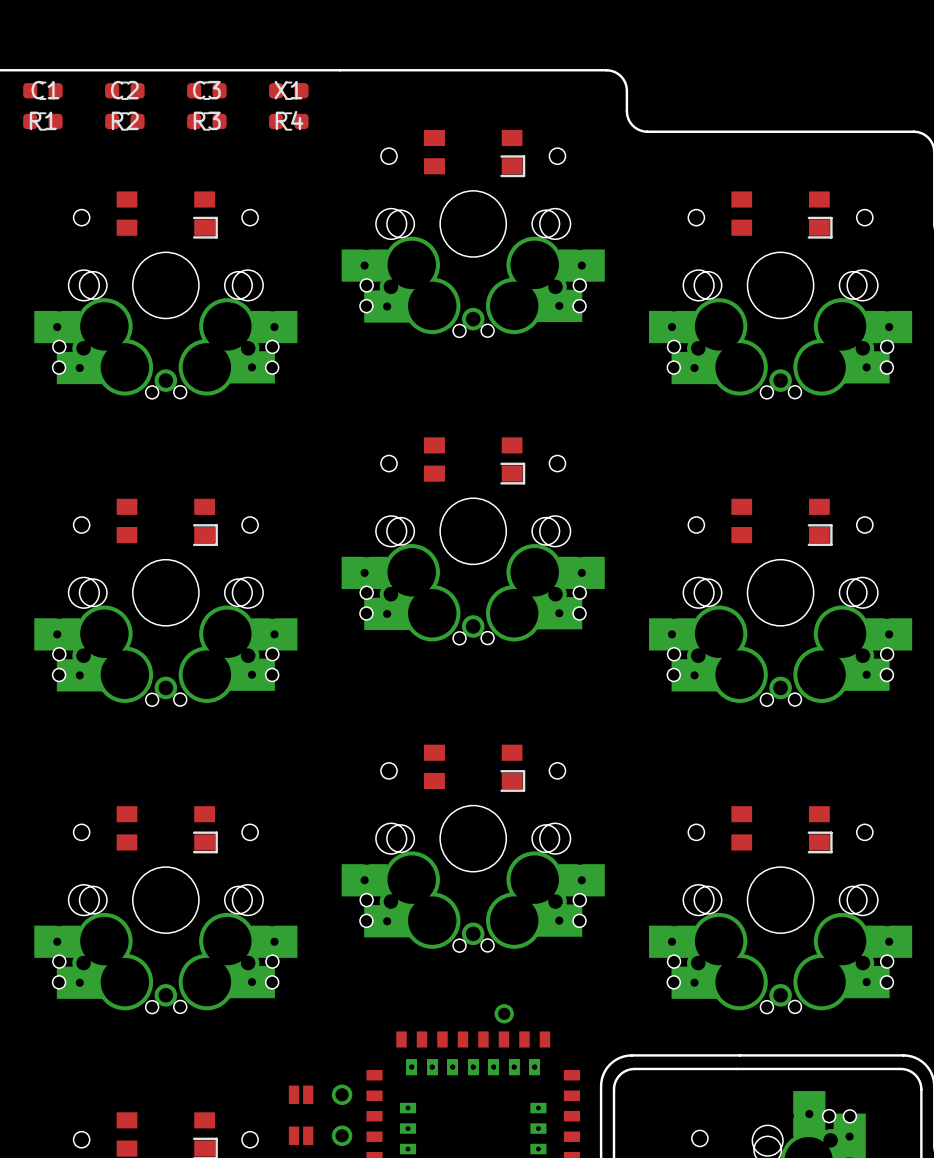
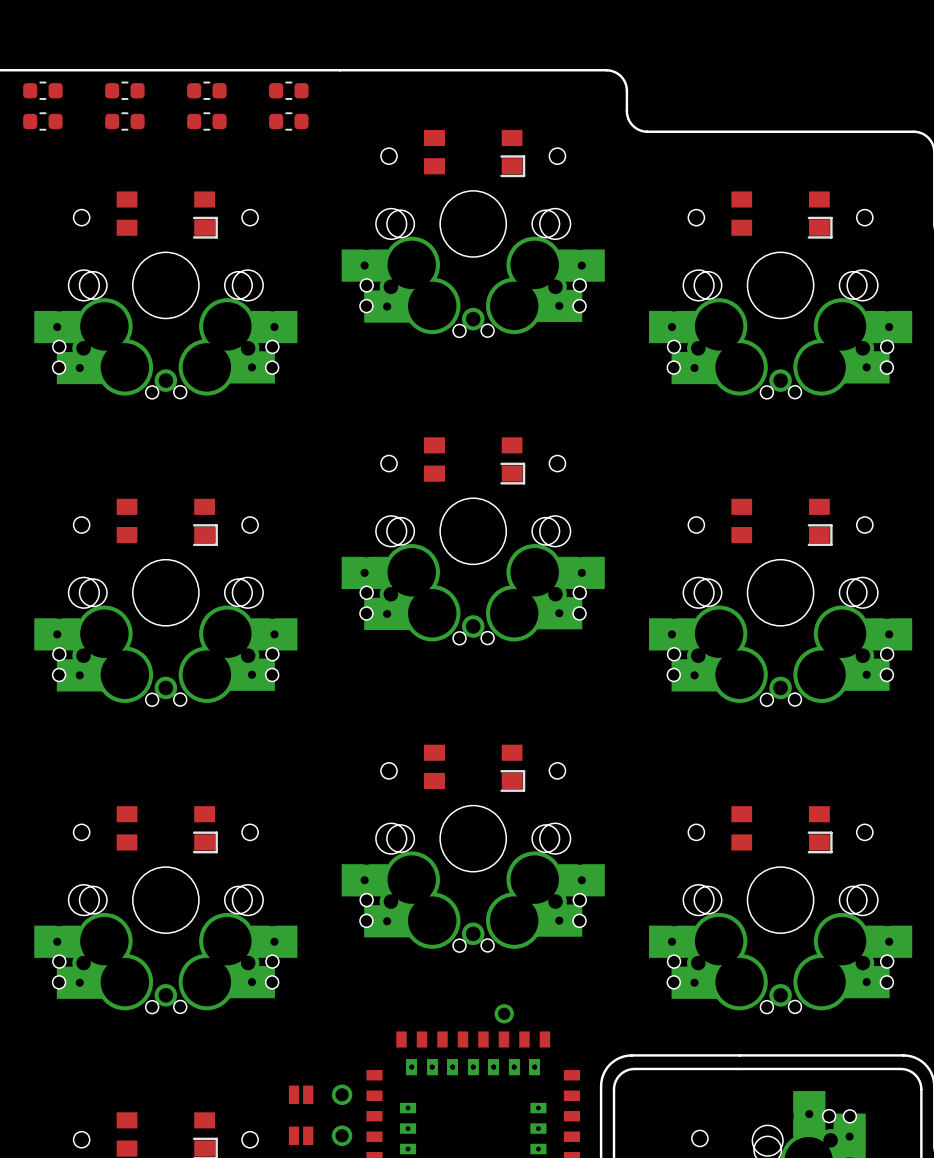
C1 name: C1 (45, 90) -> none
C2 name: C2 (124, 90) -> none
C3 name: C3 (206, 90) -> none
X1 name: X1 (288, 90) -> none
R1 name: R1 (43, 120) -> none
R2 name: R2 (125, 120) -> none
R3 name: R3 (207, 120) -> none
R4 name: R4 (289, 120) -> none

